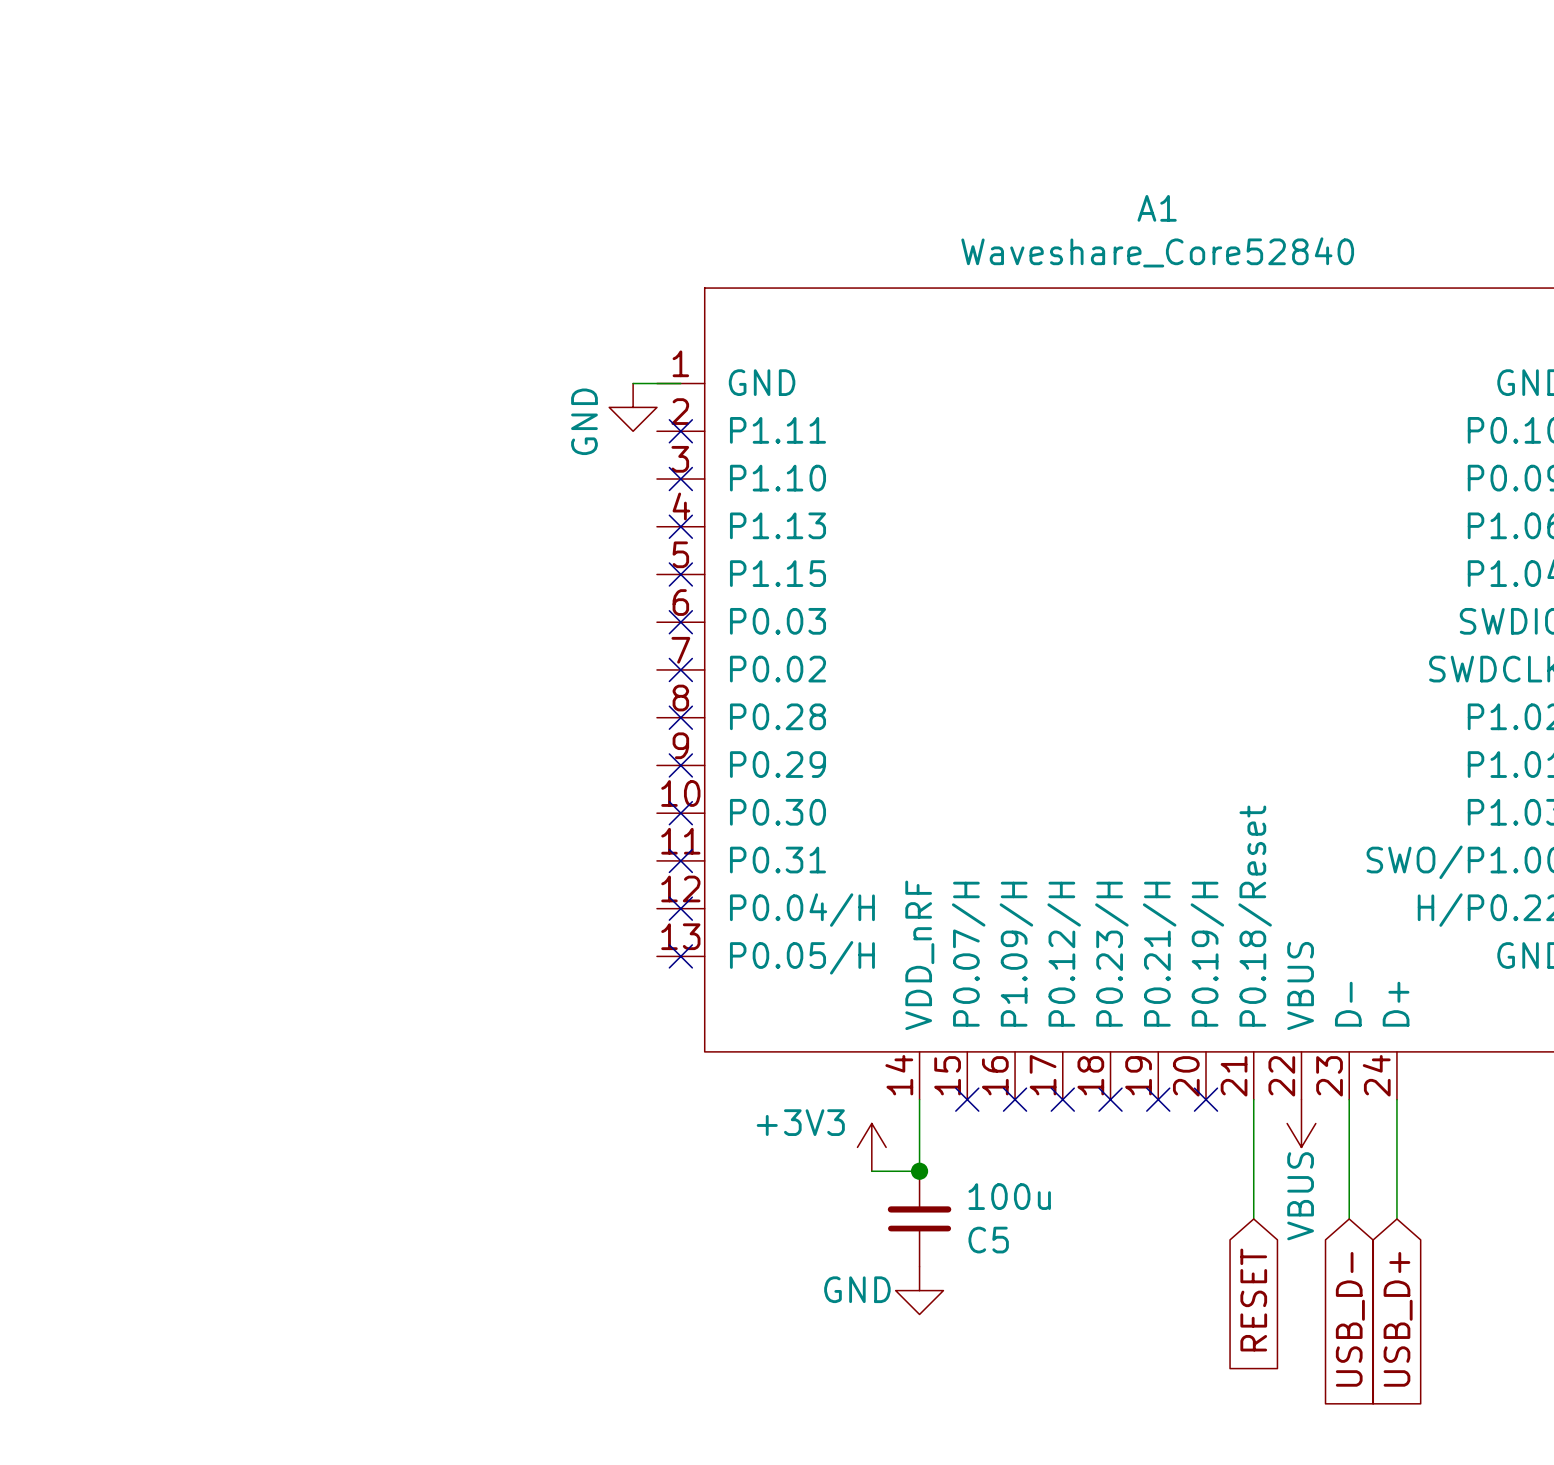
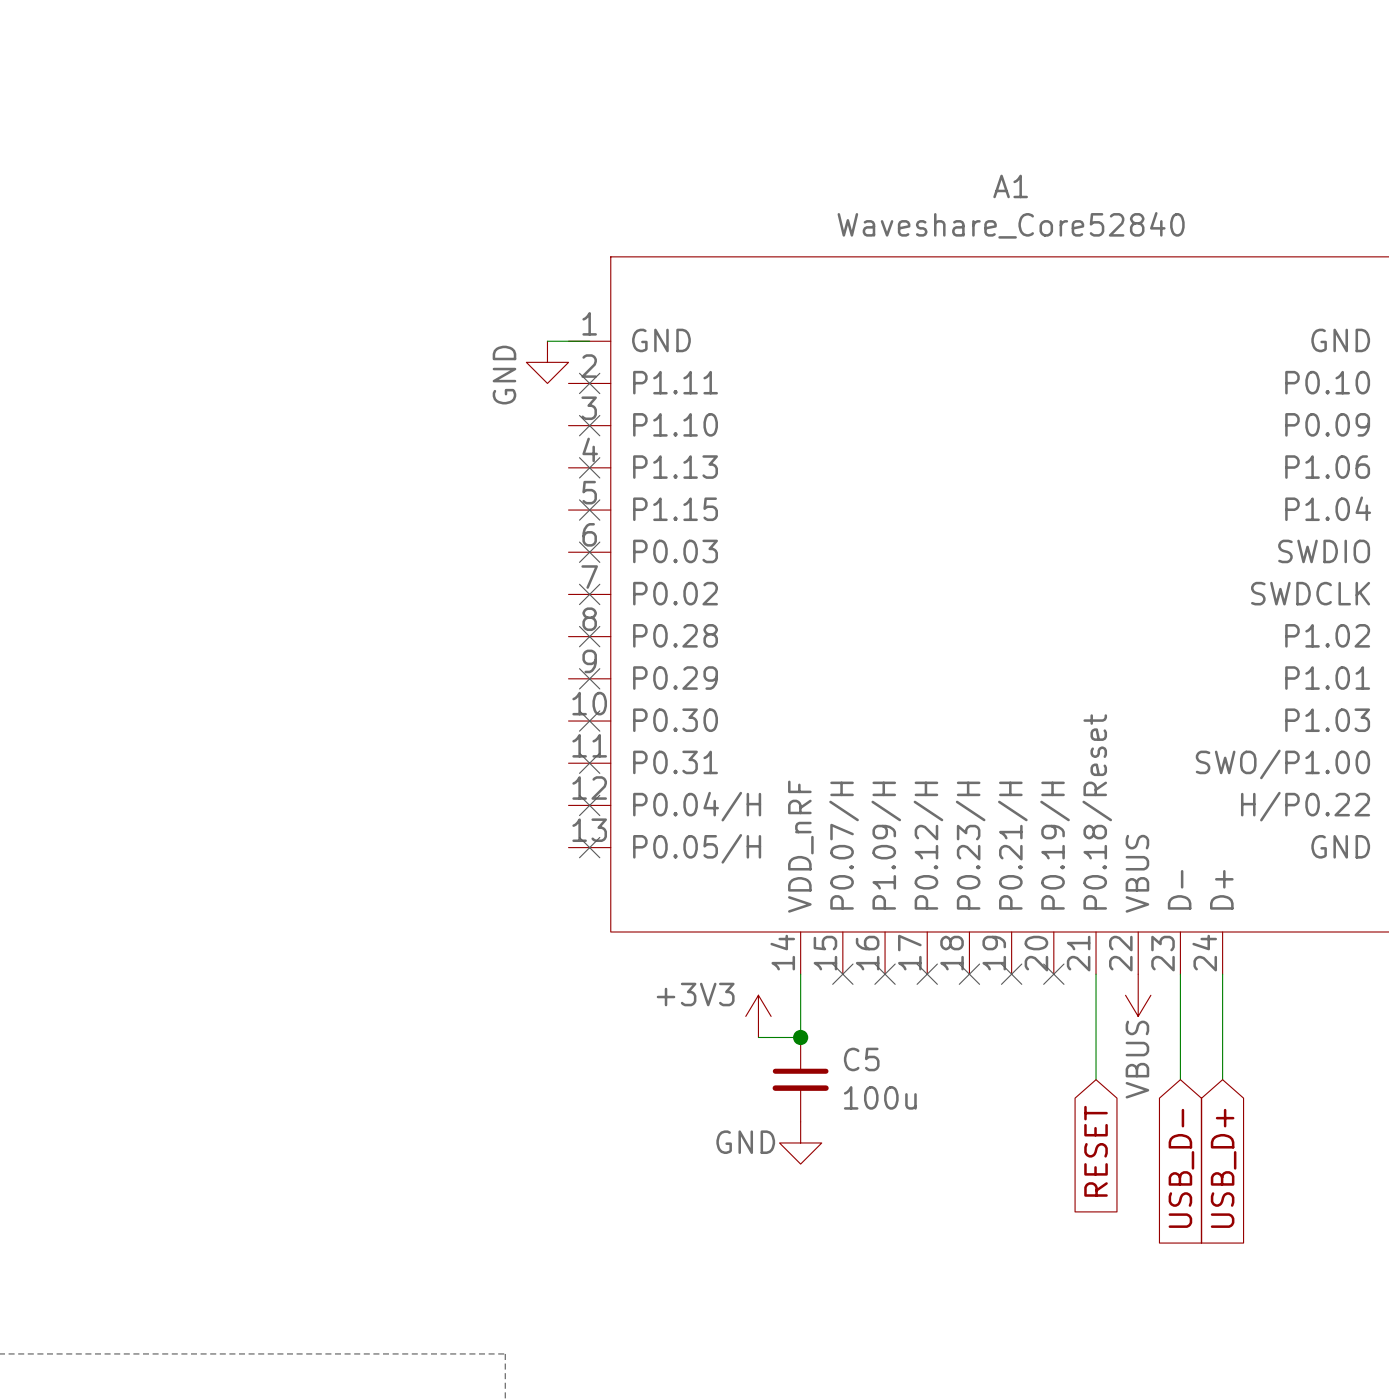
C5 value position: 100u (1009, 1196) -> 100u (880, 1097)
C5 rotation: 0° (919, 1218) -> 180° (800, 1079)
C5 name position: C5 (988, 1240) -> C5 (861, 1059)

